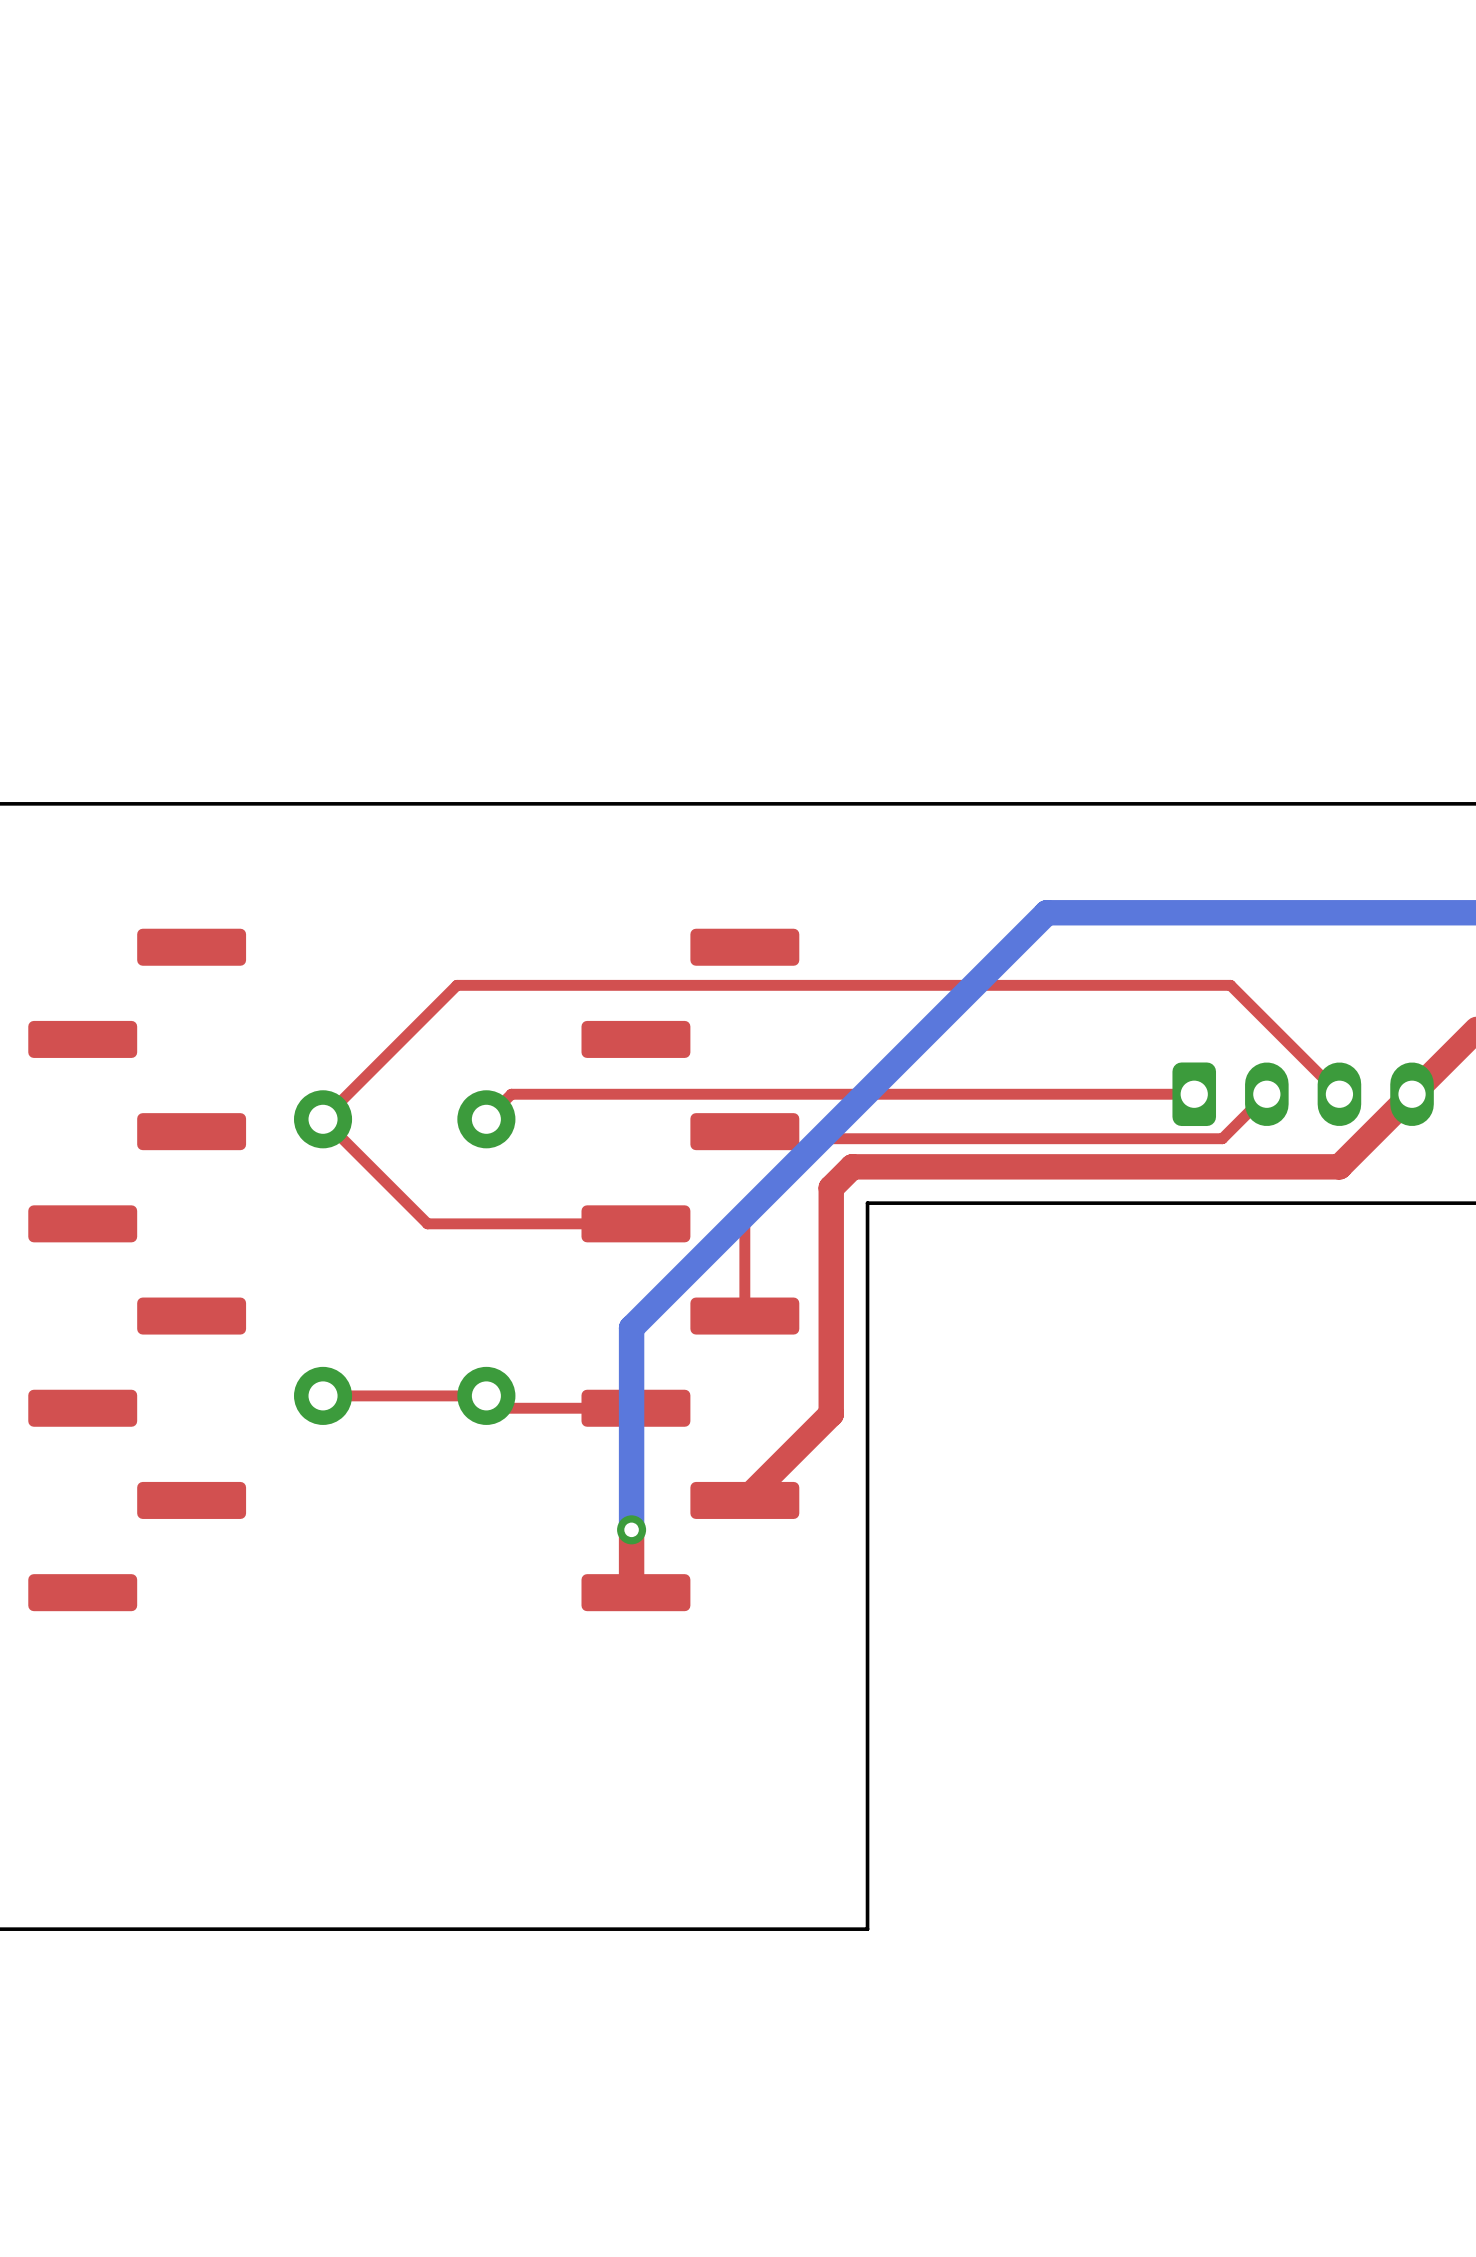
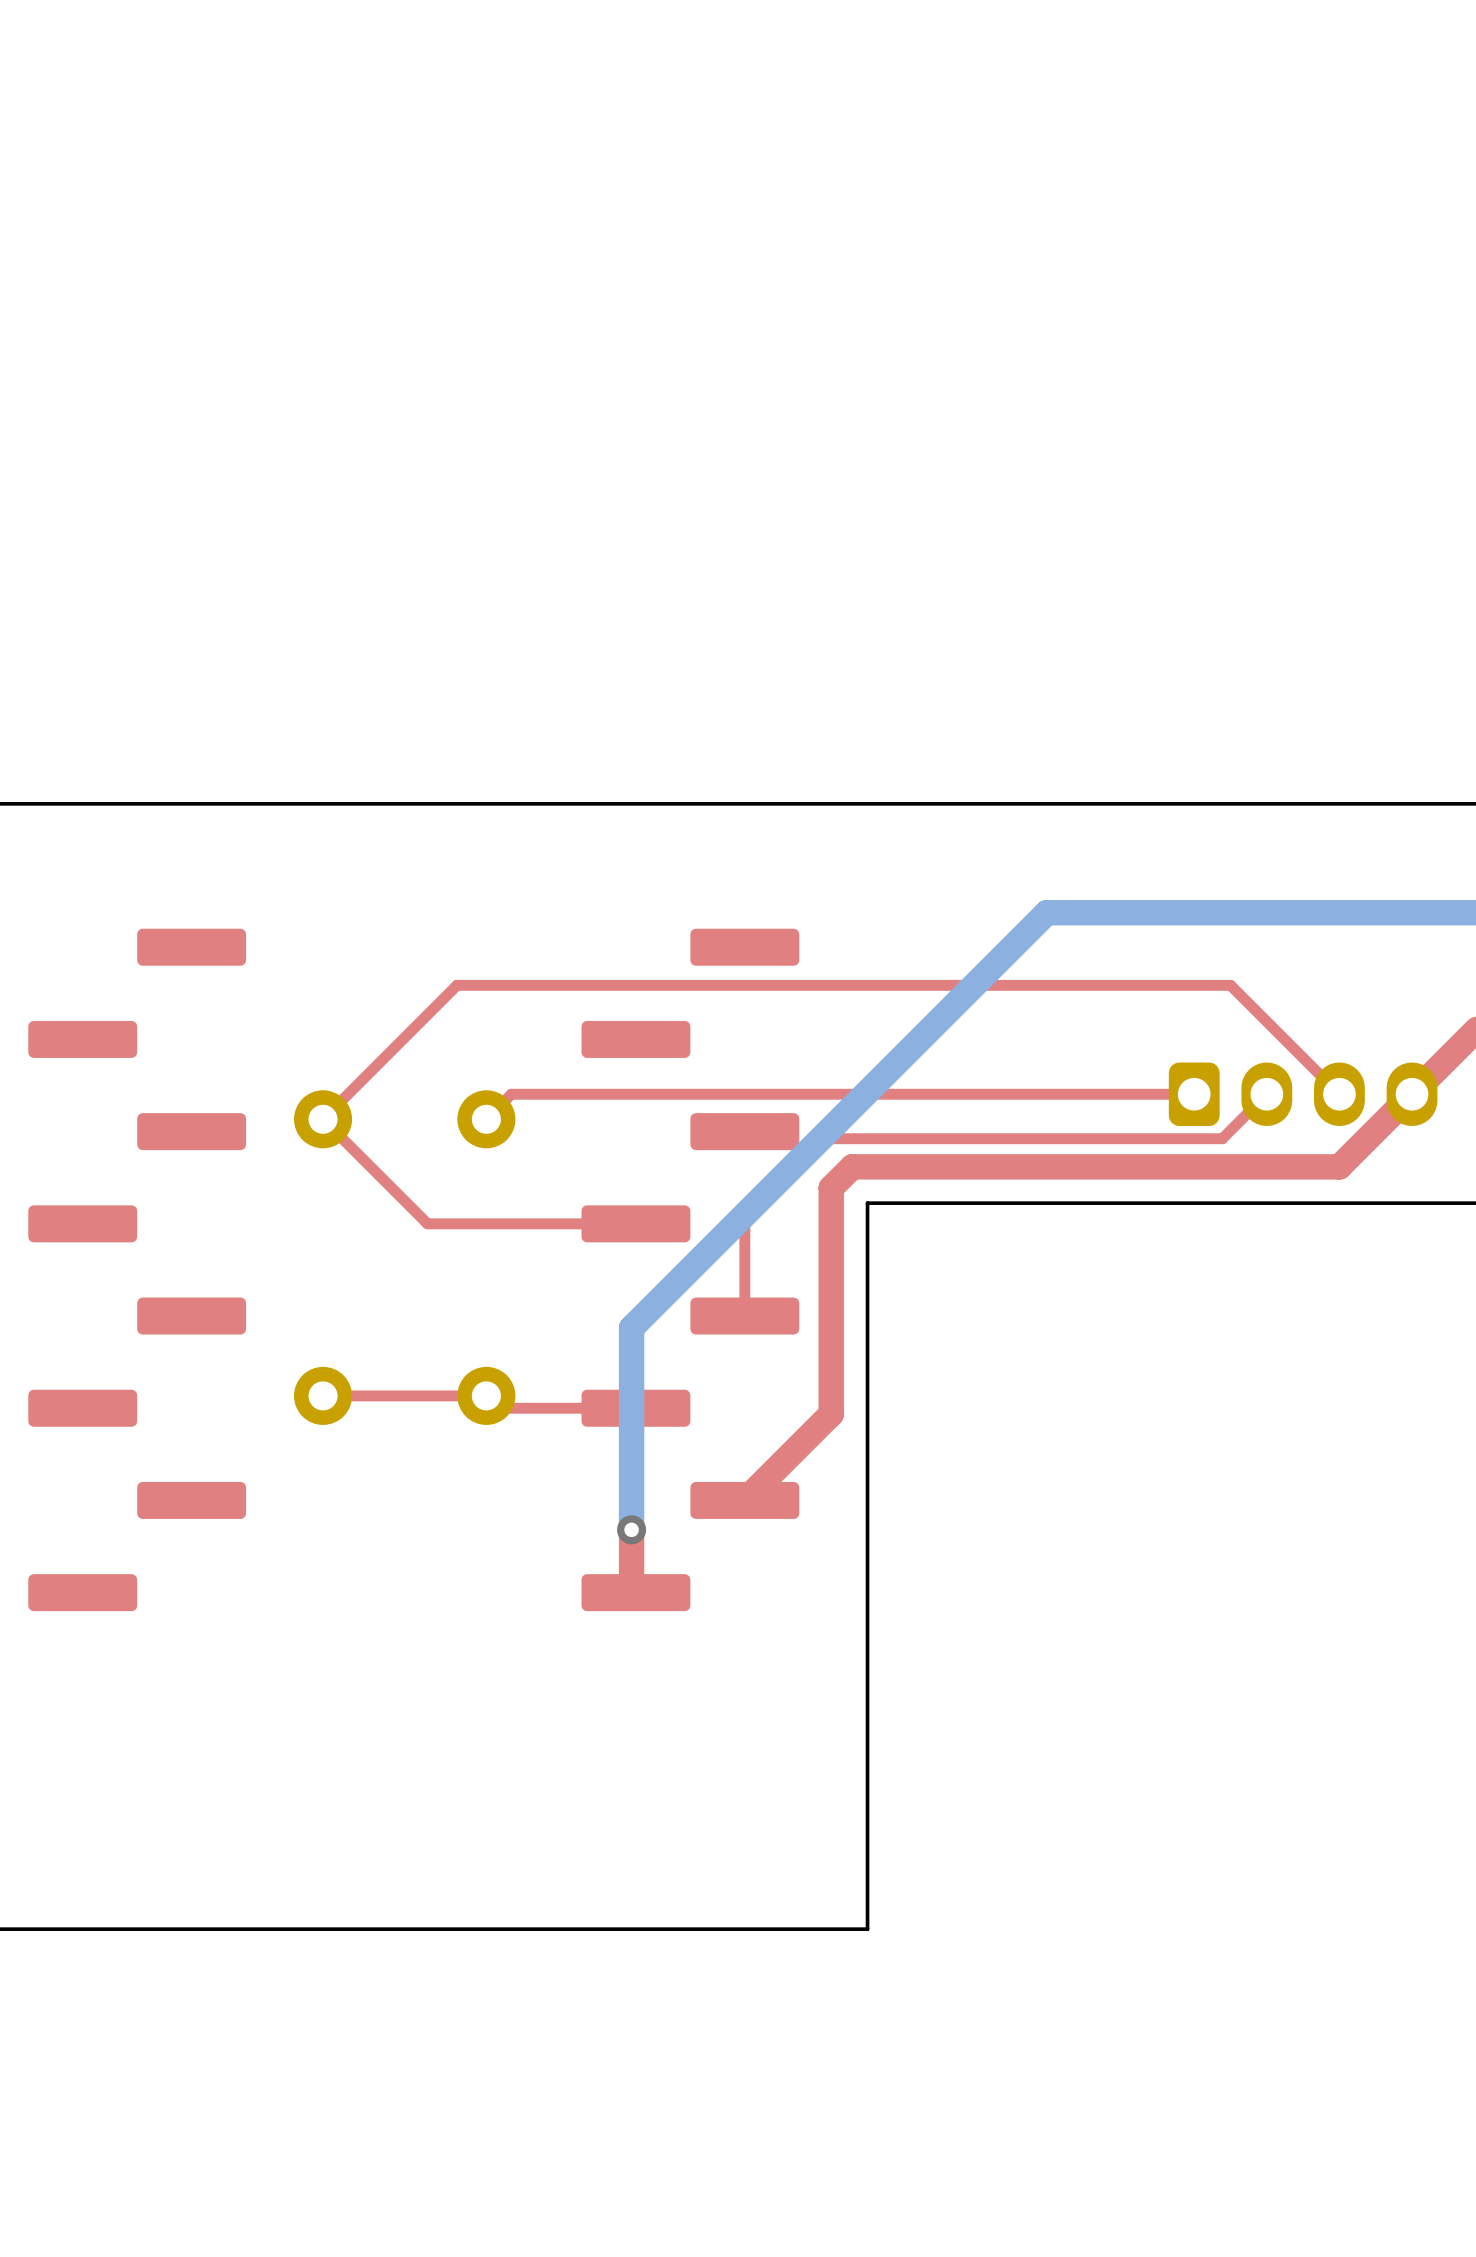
part footprint: [1172, 1062, 1434, 1127] -> [1168, 1062, 1438, 1127]

